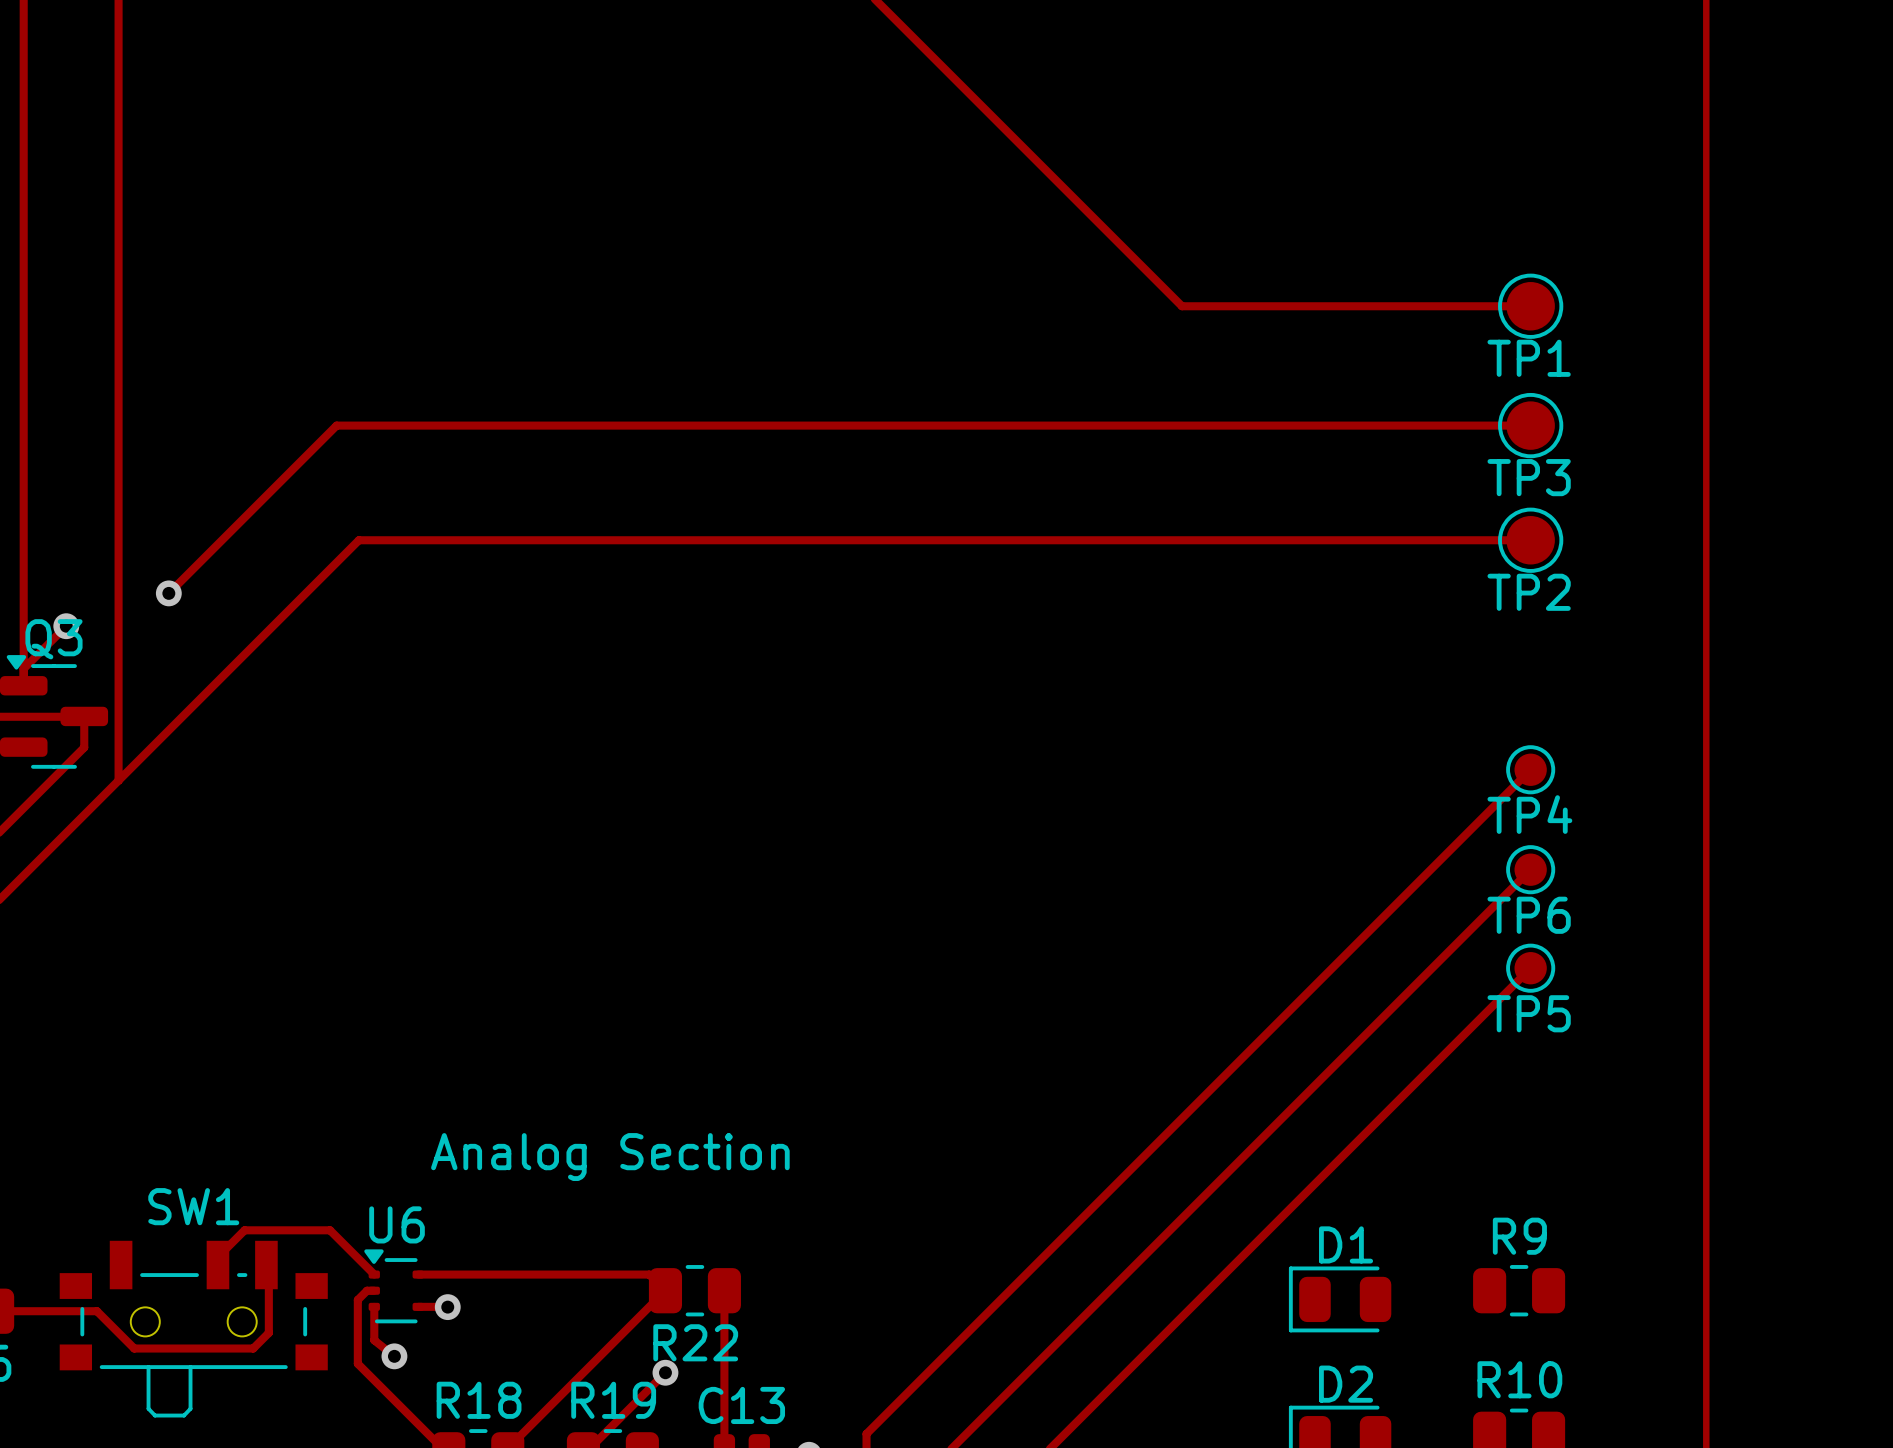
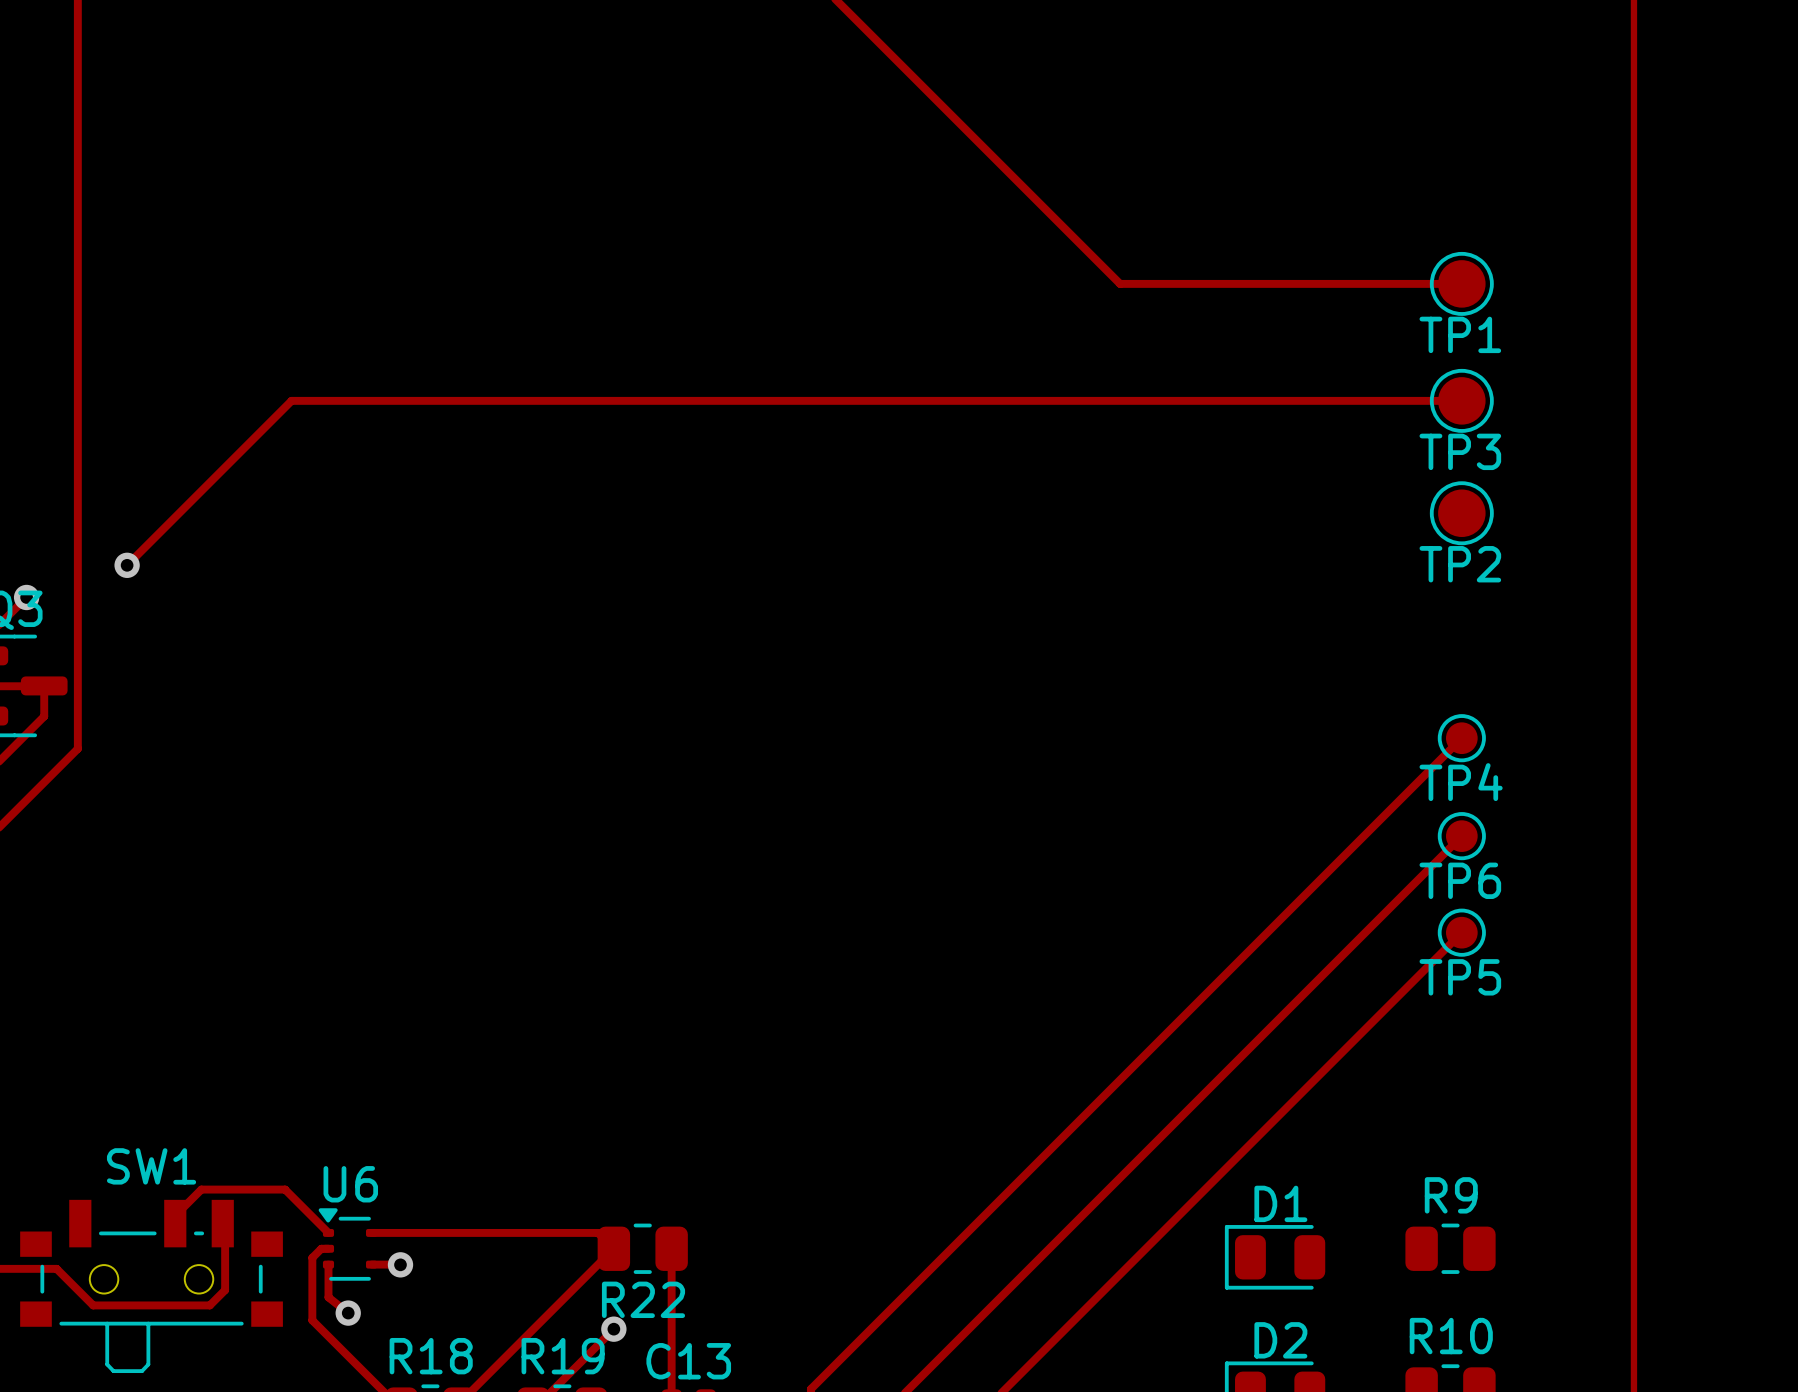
track: (1530, 540) (358, 540) (118, 780) -> none
text: Analog Section (610, 1157) -> none

